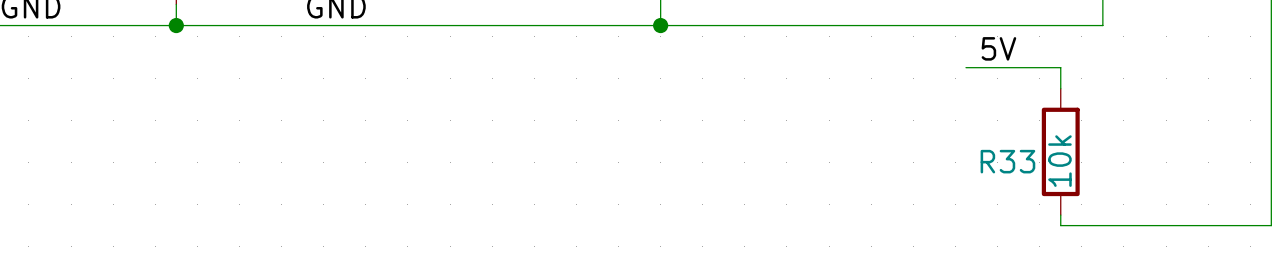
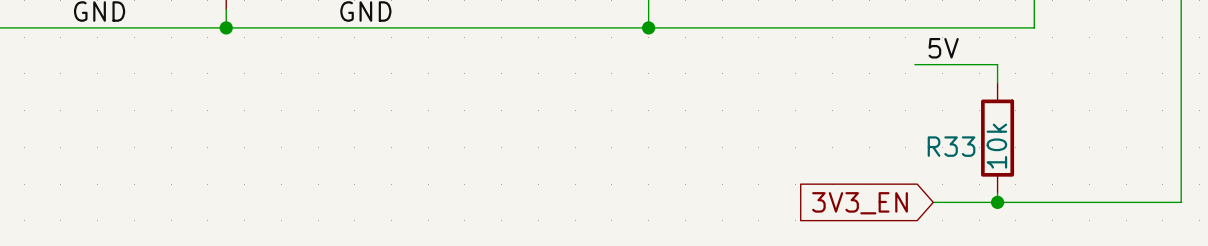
wire: none -> (933, 202) (997, 202)
junction: none -> (997, 202)
global label: none -> 3V3_EN (860, 203)

